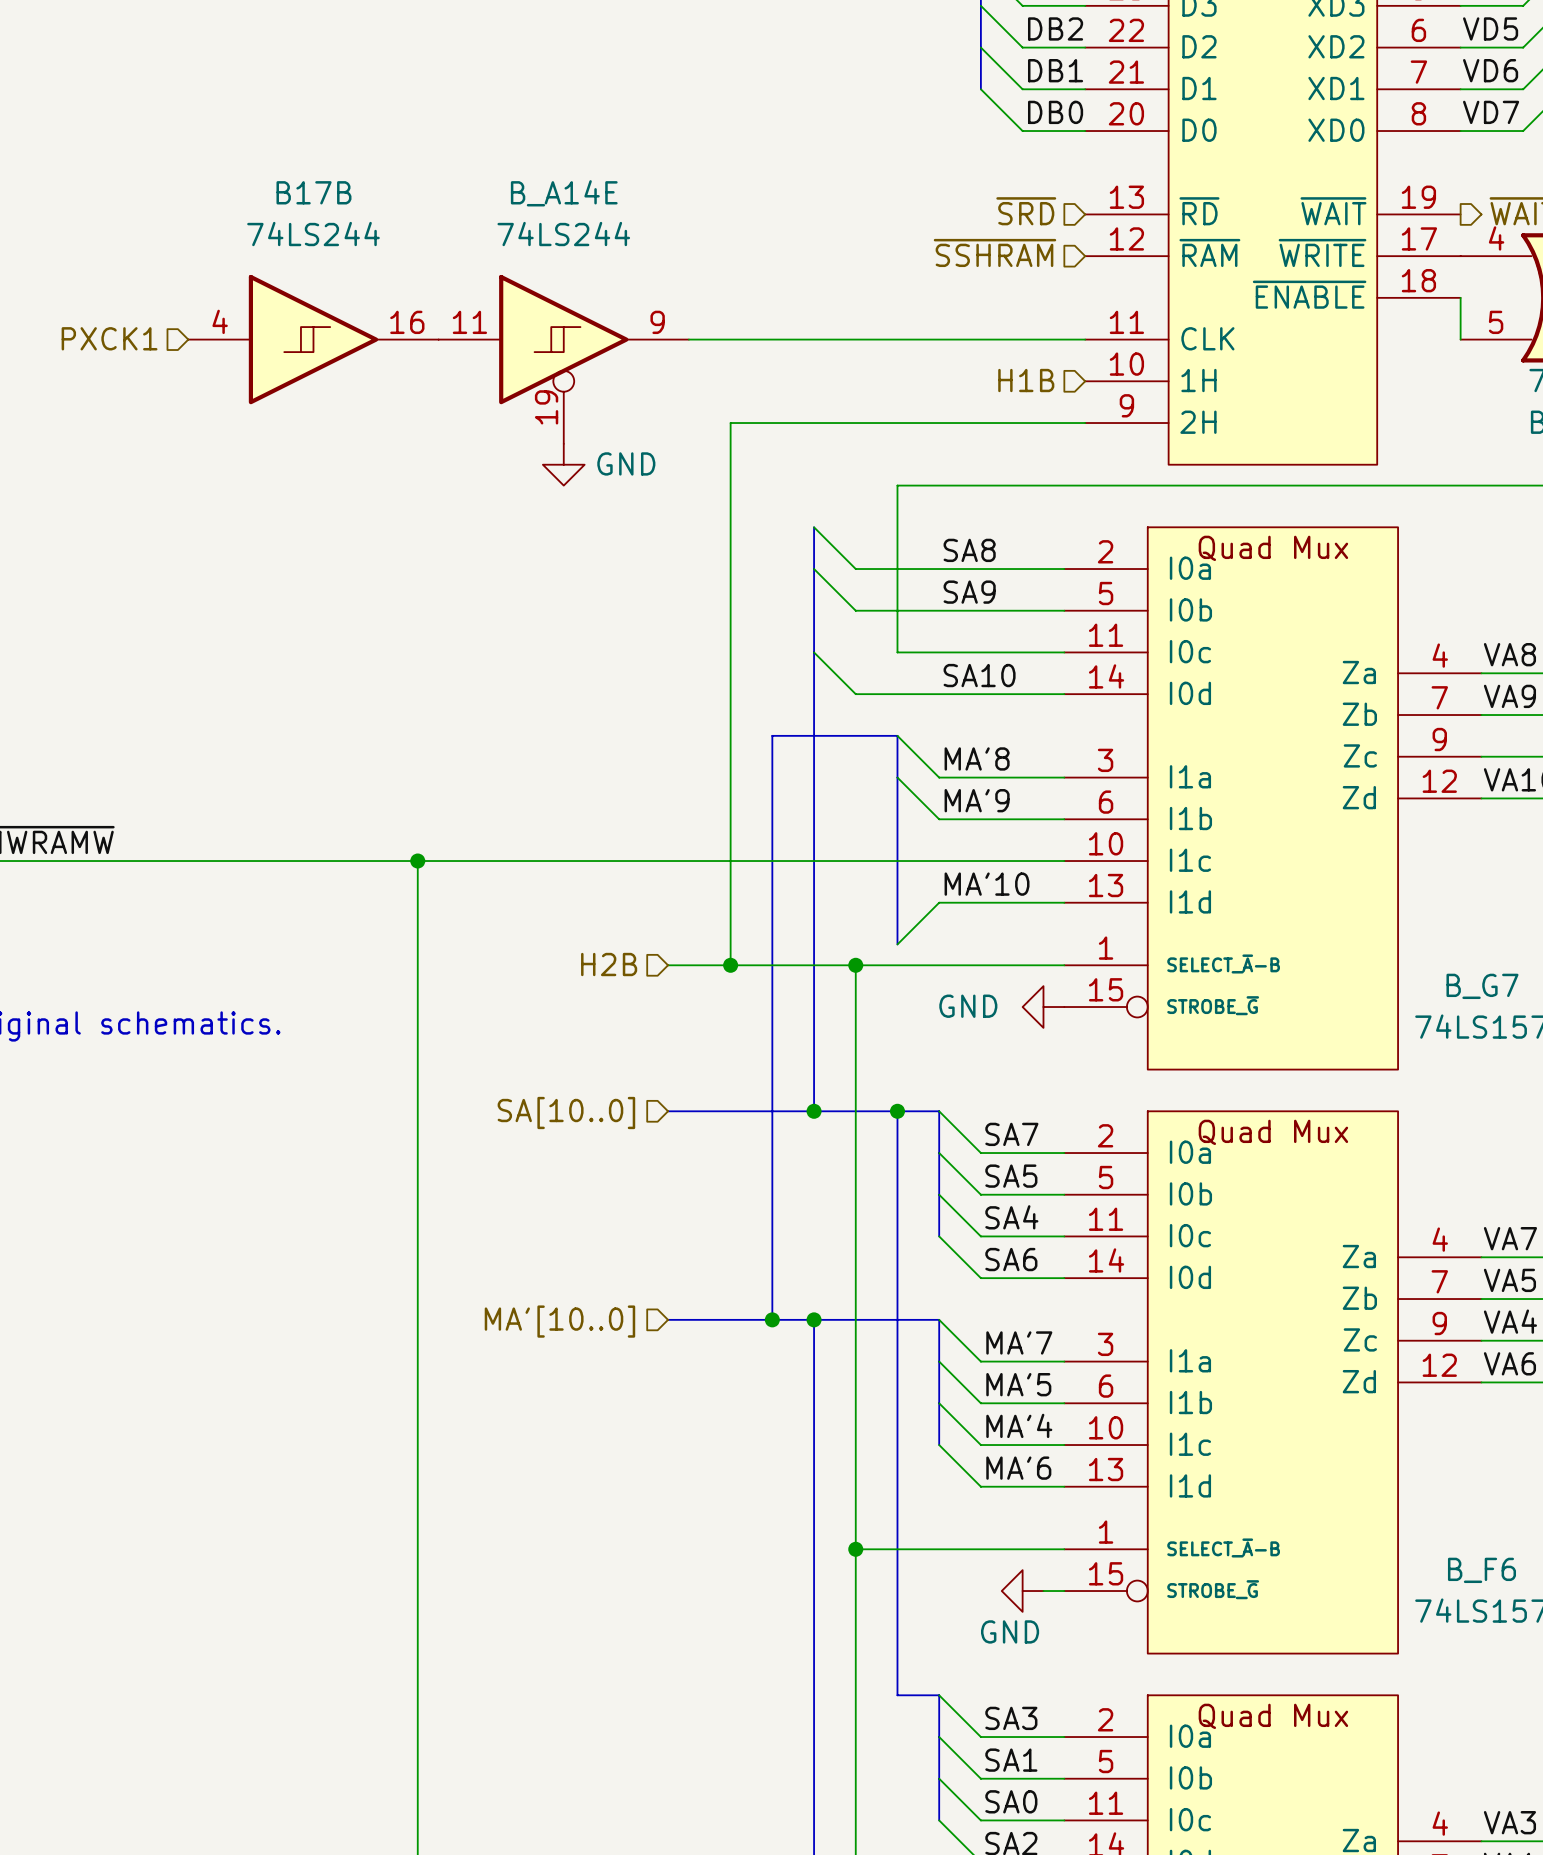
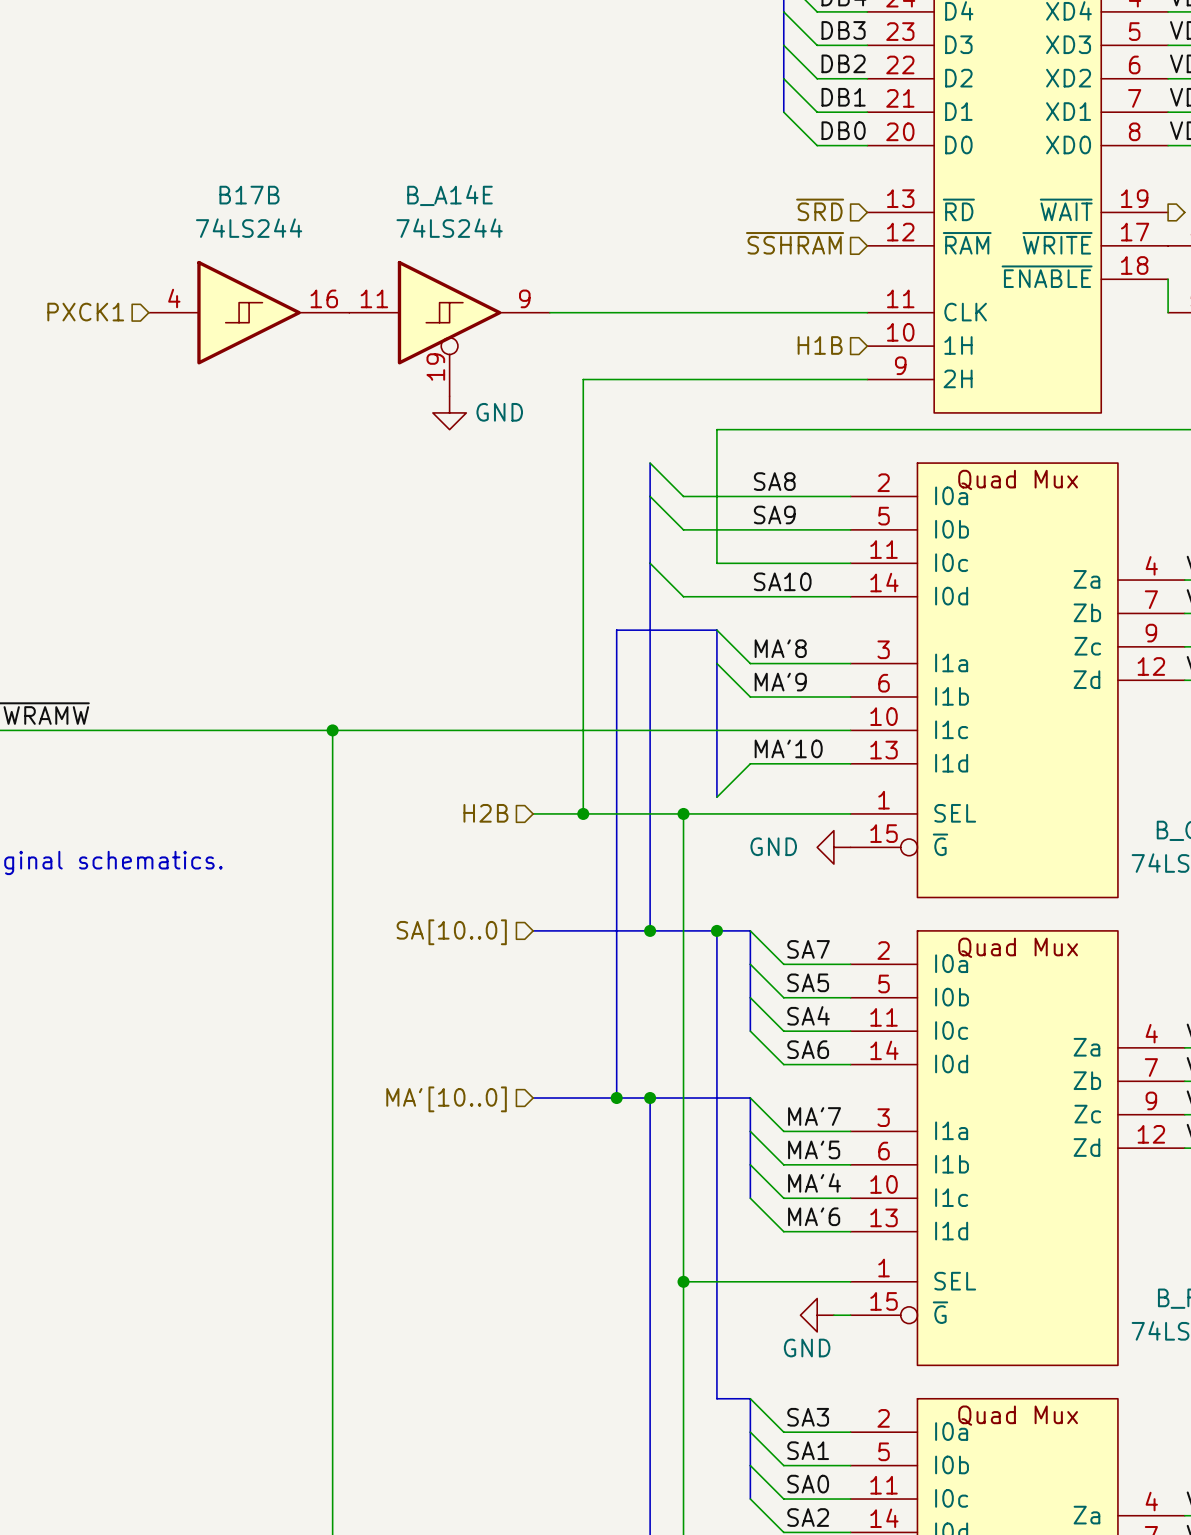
B_G7 pin name: SELECT_~{A}-B (1223, 963) -> SEL (955, 813)
B_G7 pin name: STROBE_~{G} (1213, 1005) -> ~{G} (940, 844)
B_F6 pin name: SELECT_~{A}-B (1223, 1547) -> SEL (955, 1281)
B_F6 pin name: STROBE_~{G} (1213, 1589) -> ~{G} (940, 1312)

